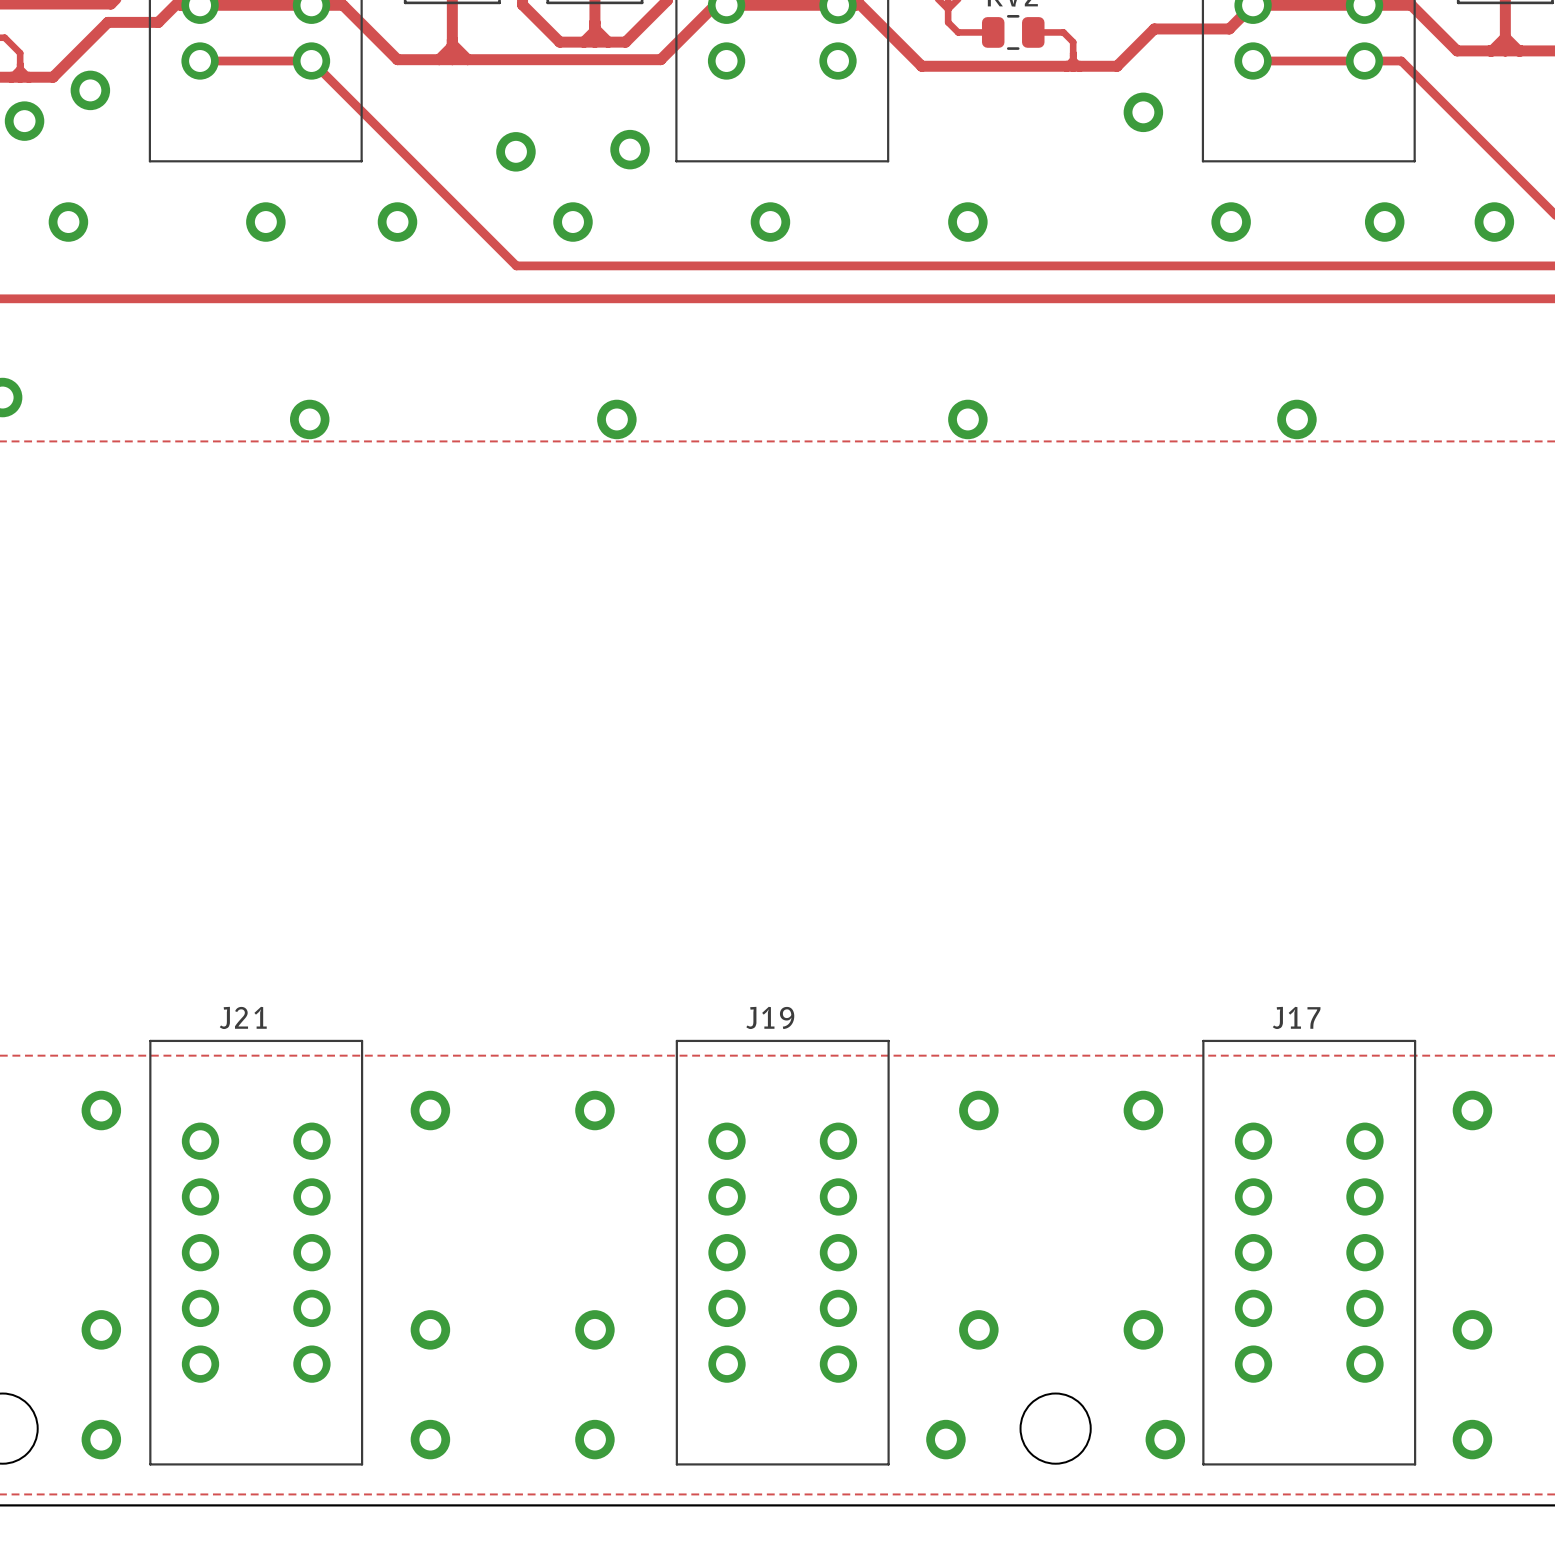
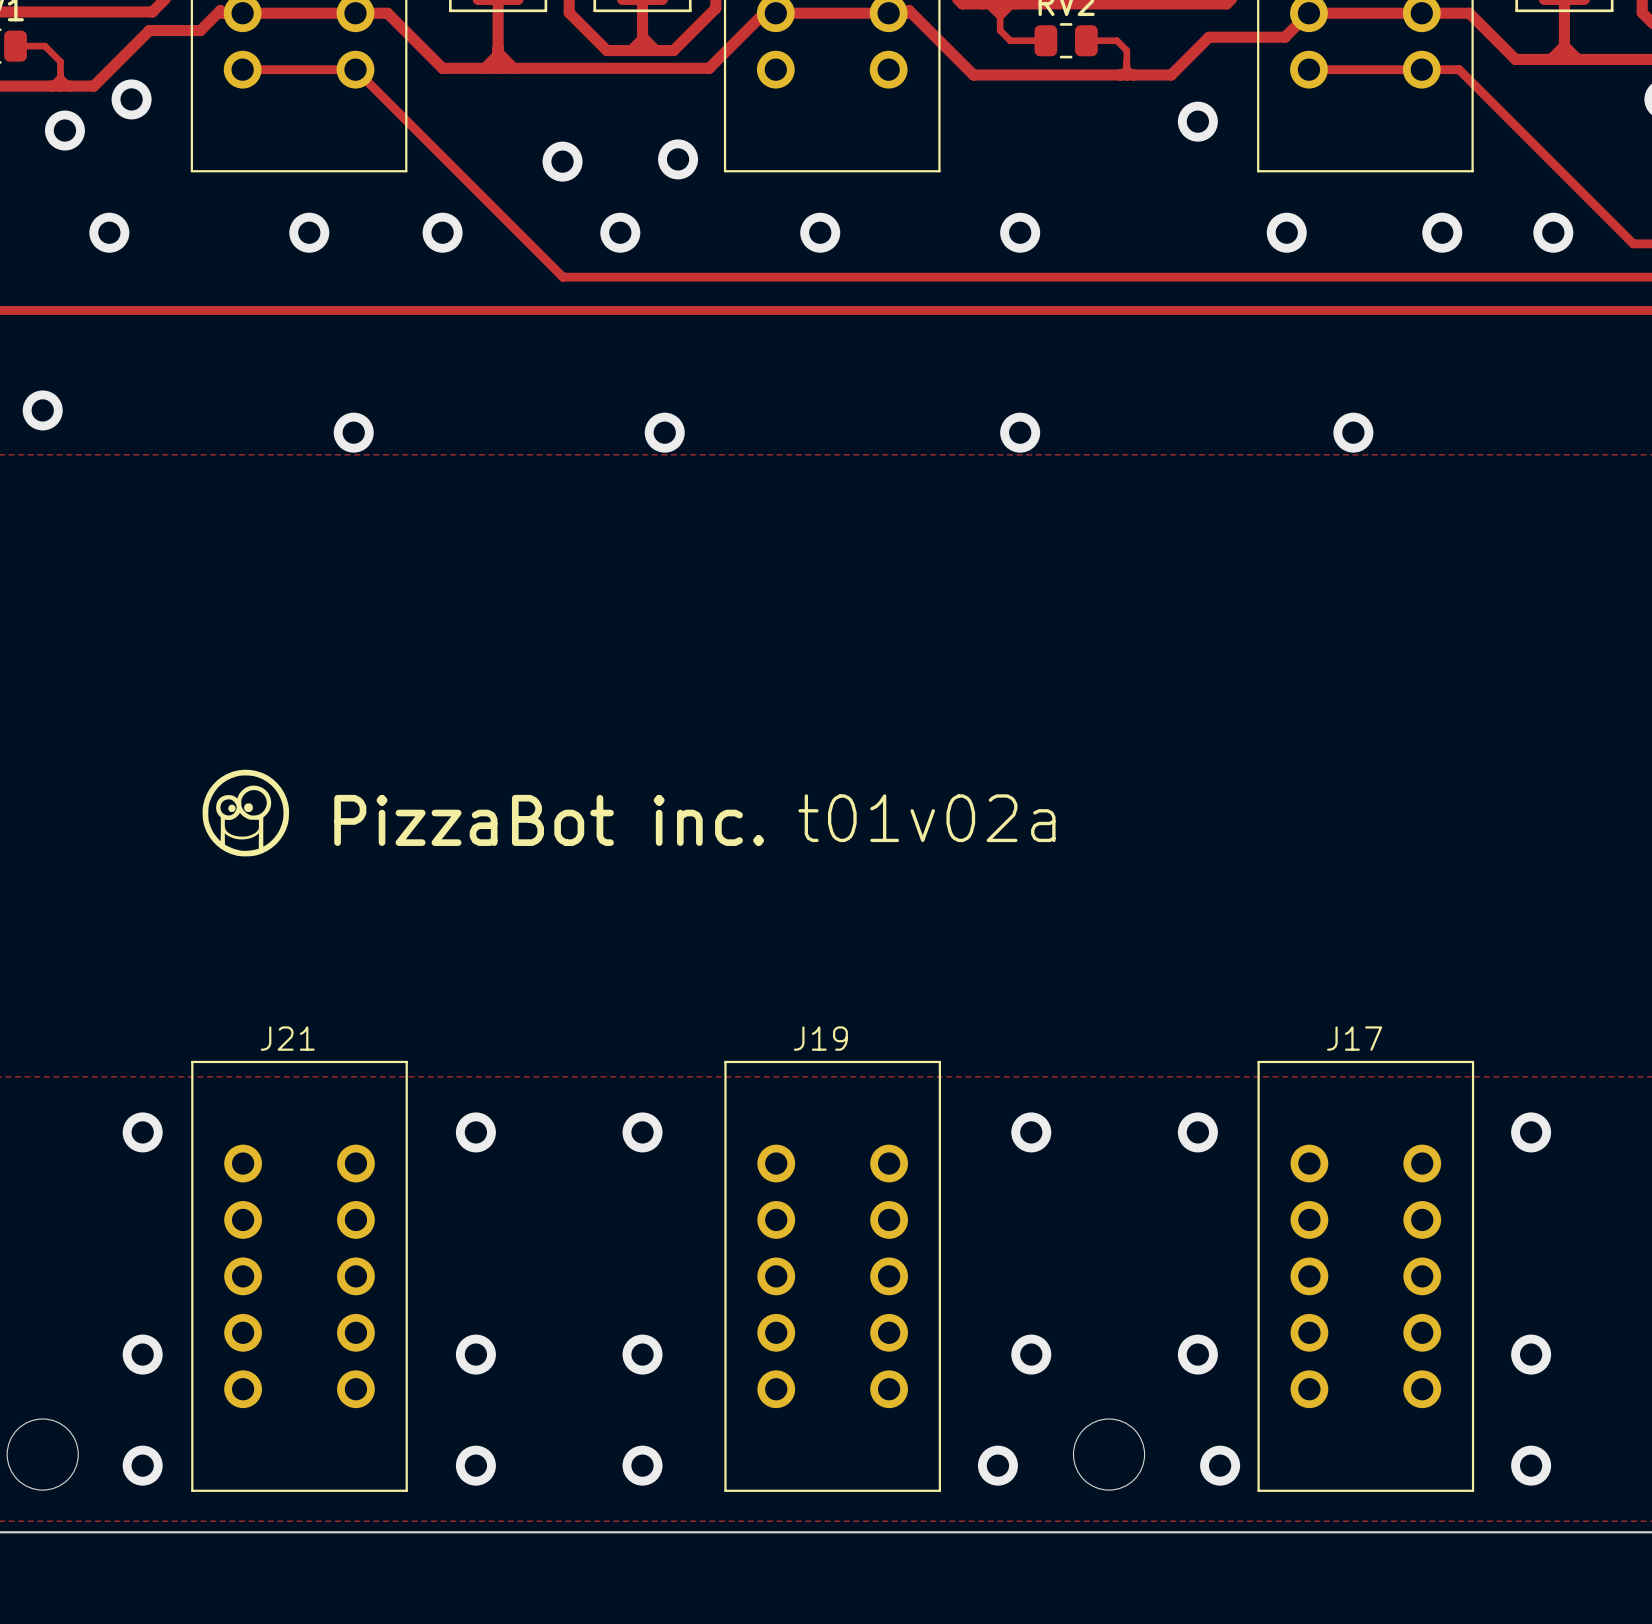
drawing: none -> [202, 769, 290, 857]
text: none -> t01v02a (926, 818)
text: none -> PizzaBot inc. (549, 820)

